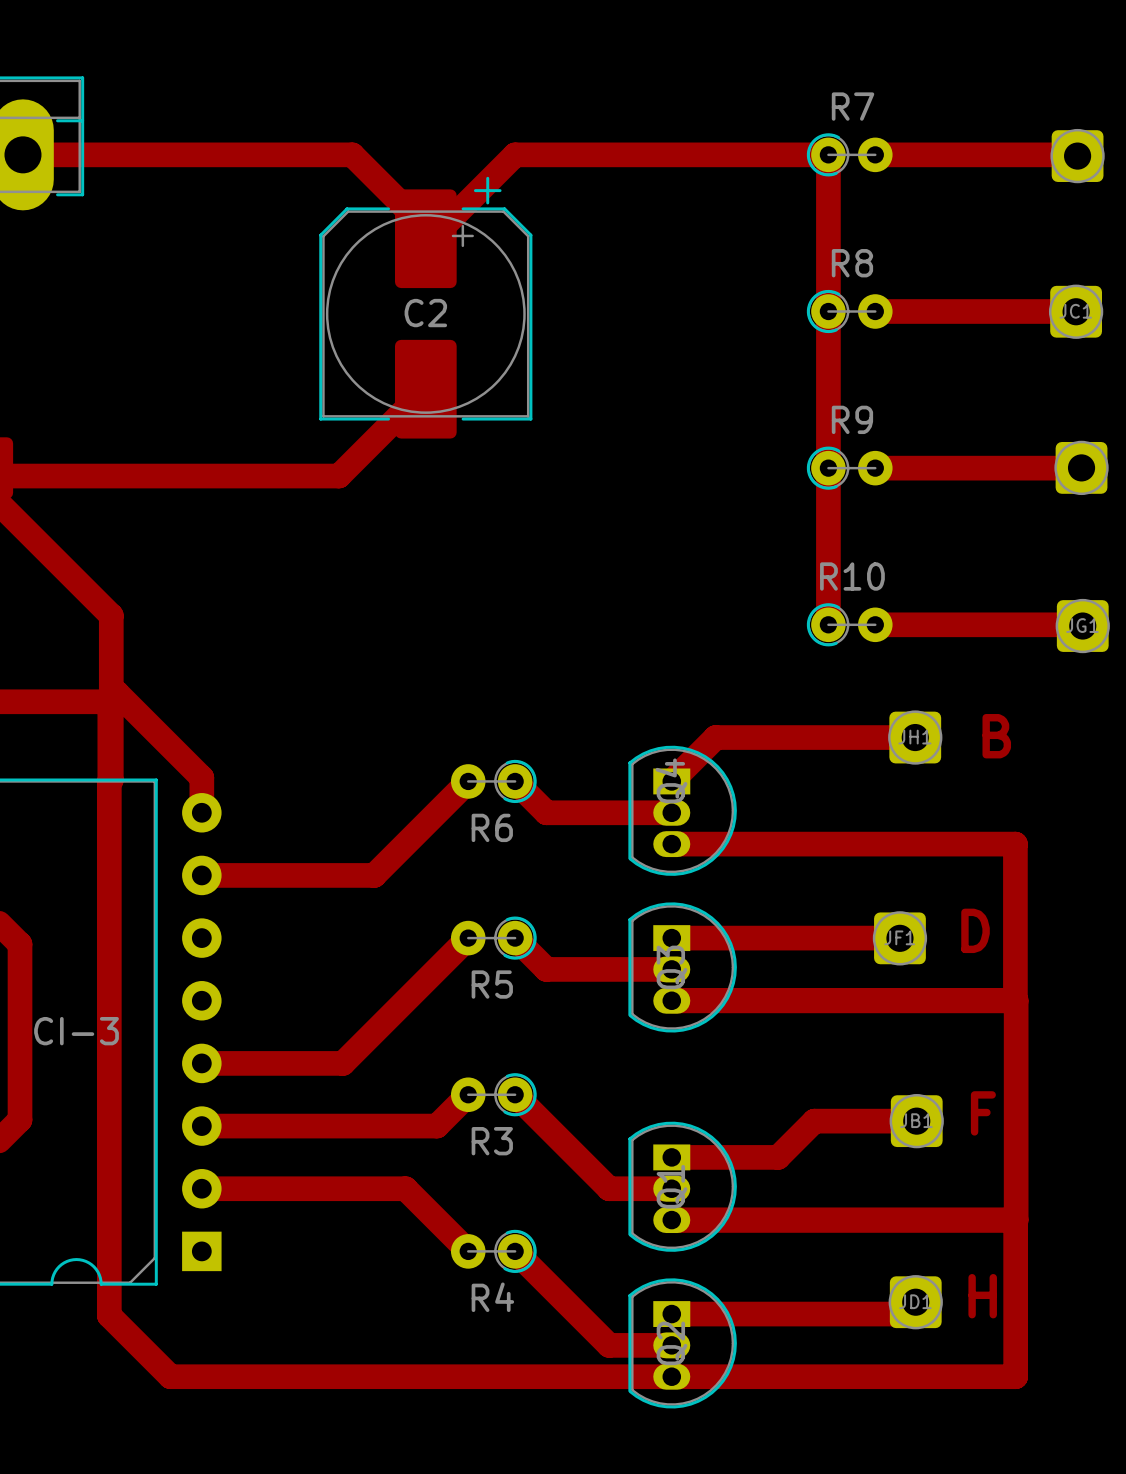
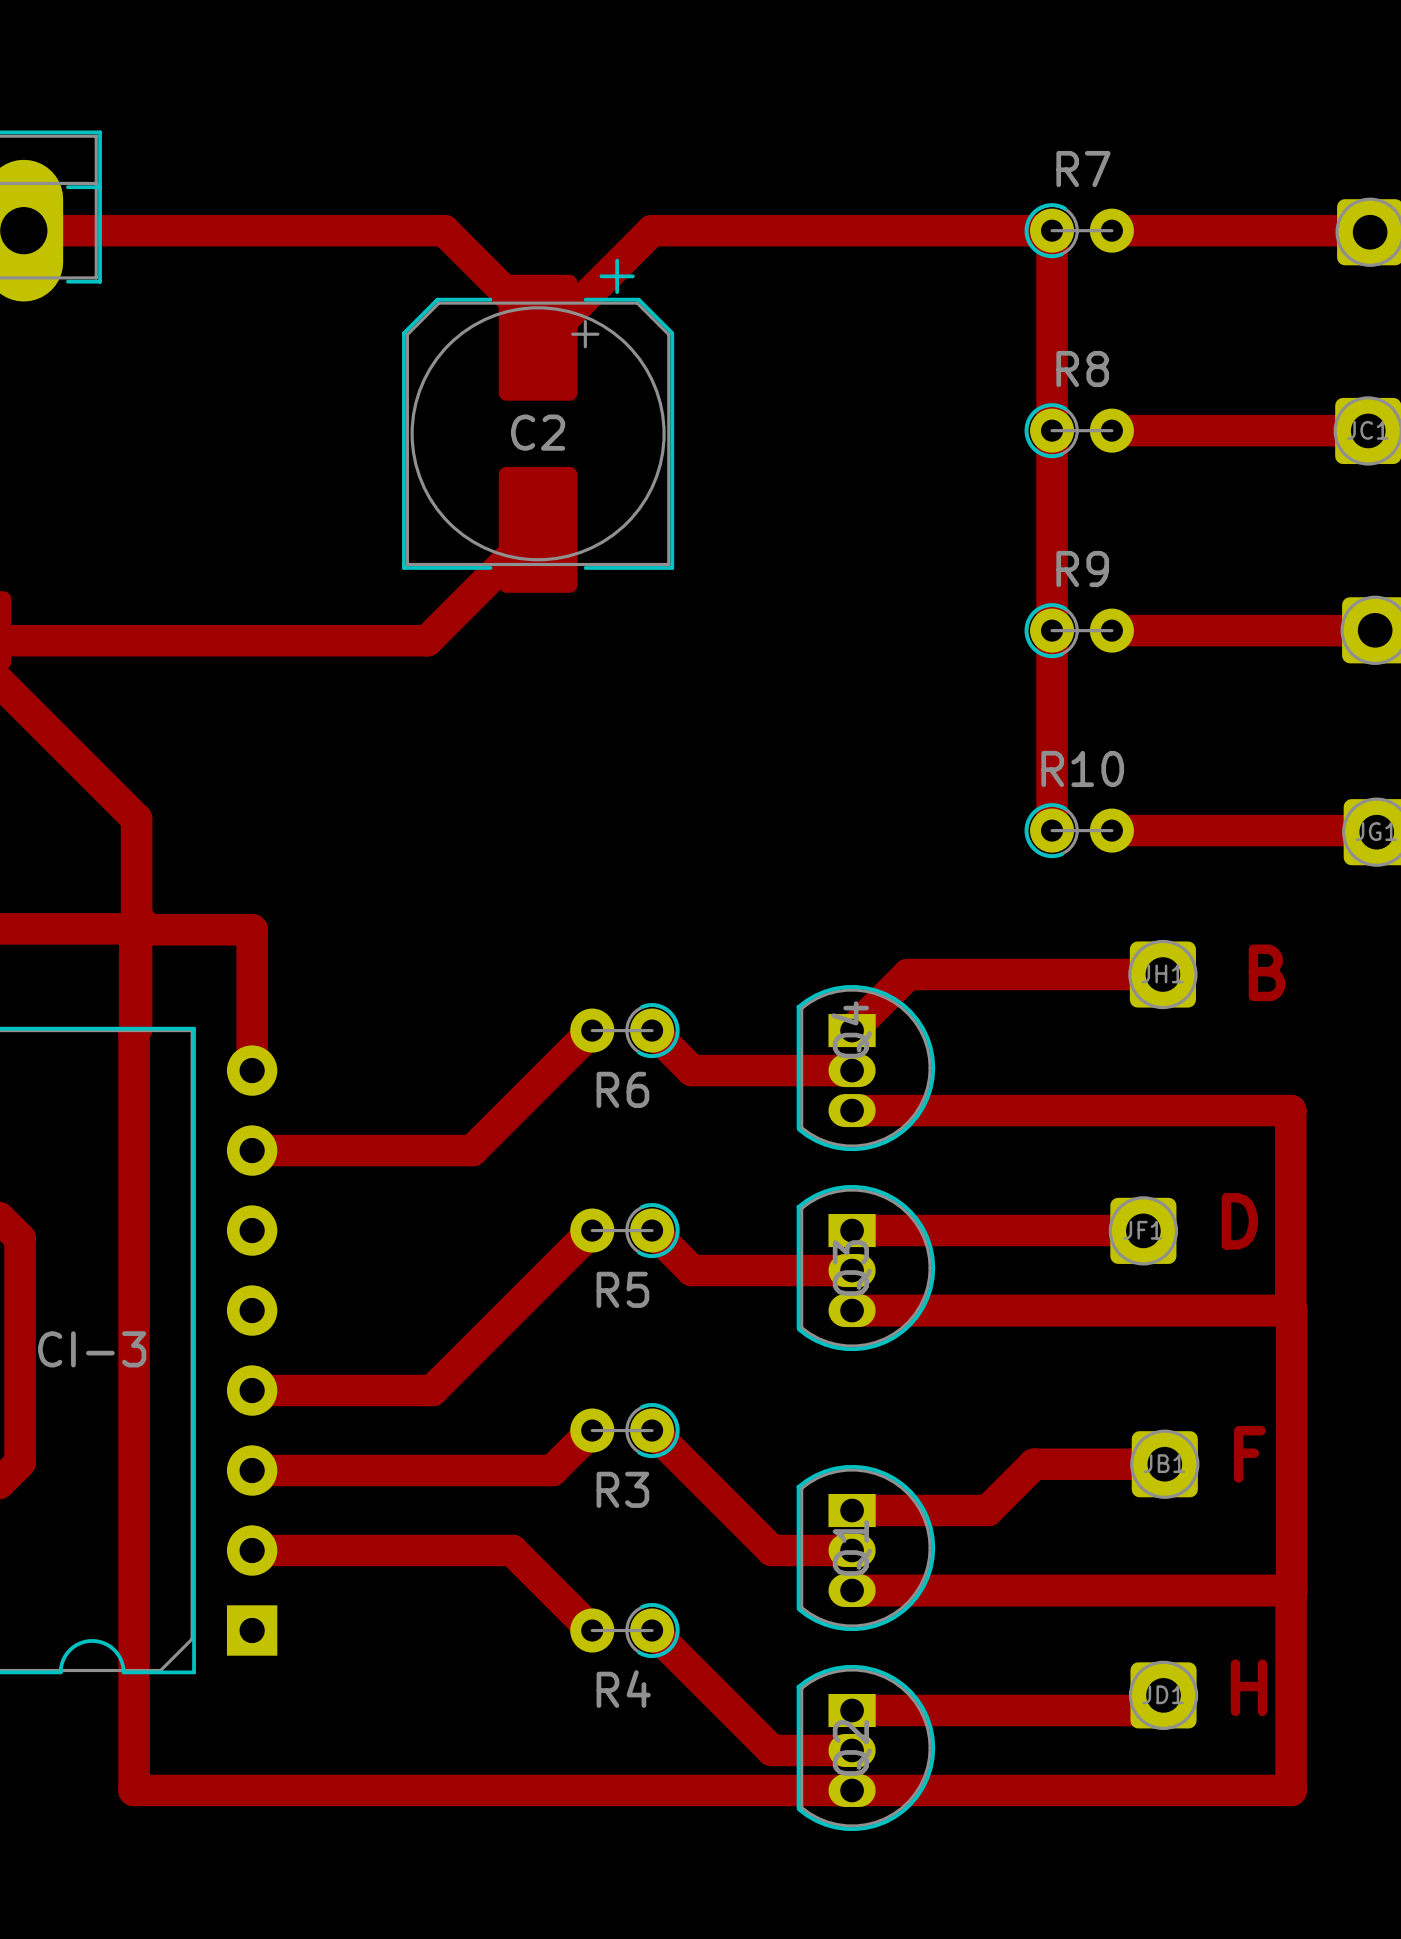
track: (111, 692) (116, 692) (201, 777) -> (136, 917) (149, 929) (252, 929) (252, 1025)
track: (109, 1315) (170, 1376) -> (134, 1712) (134, 1790) (212, 1790)

